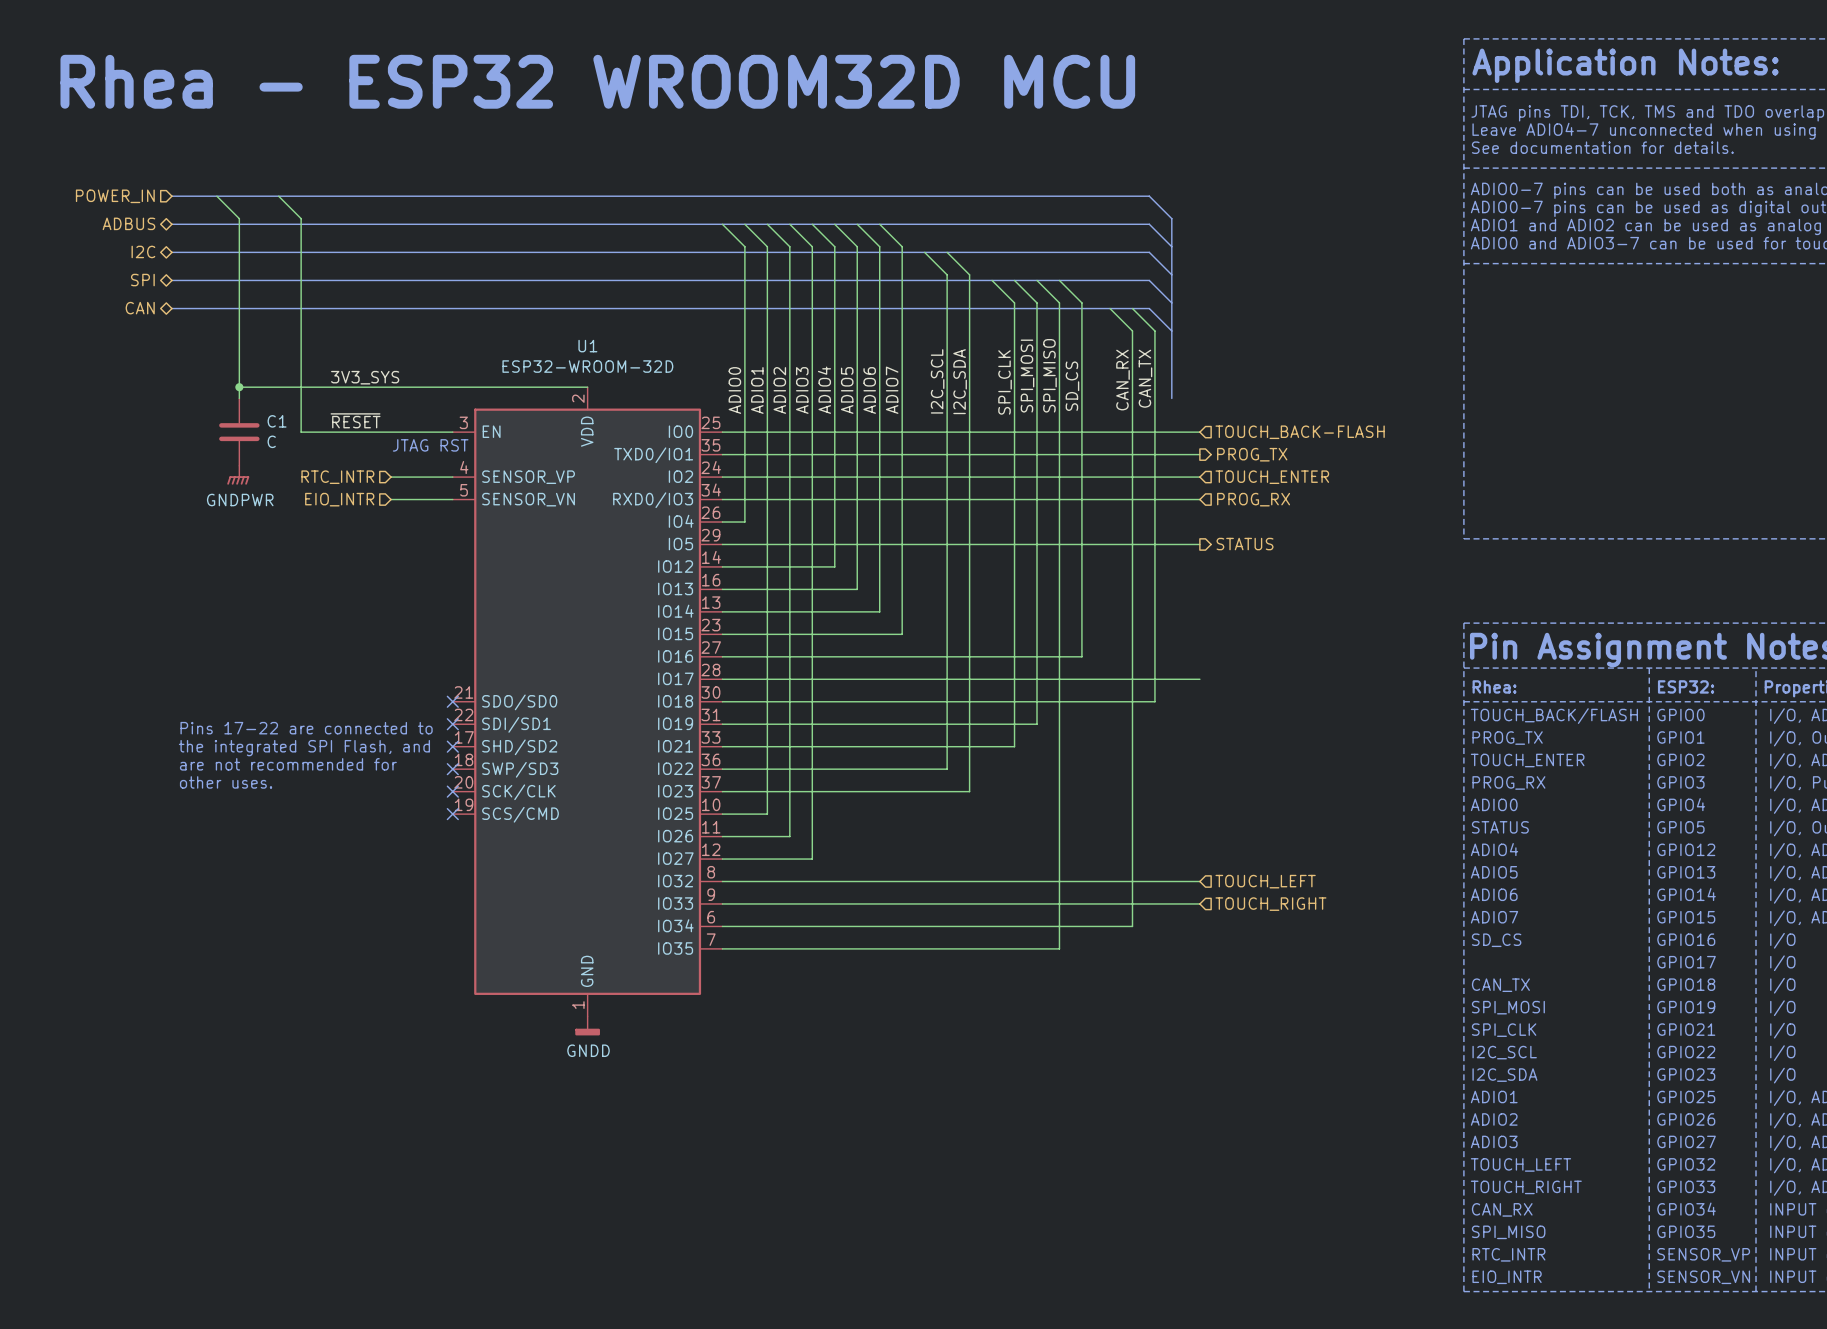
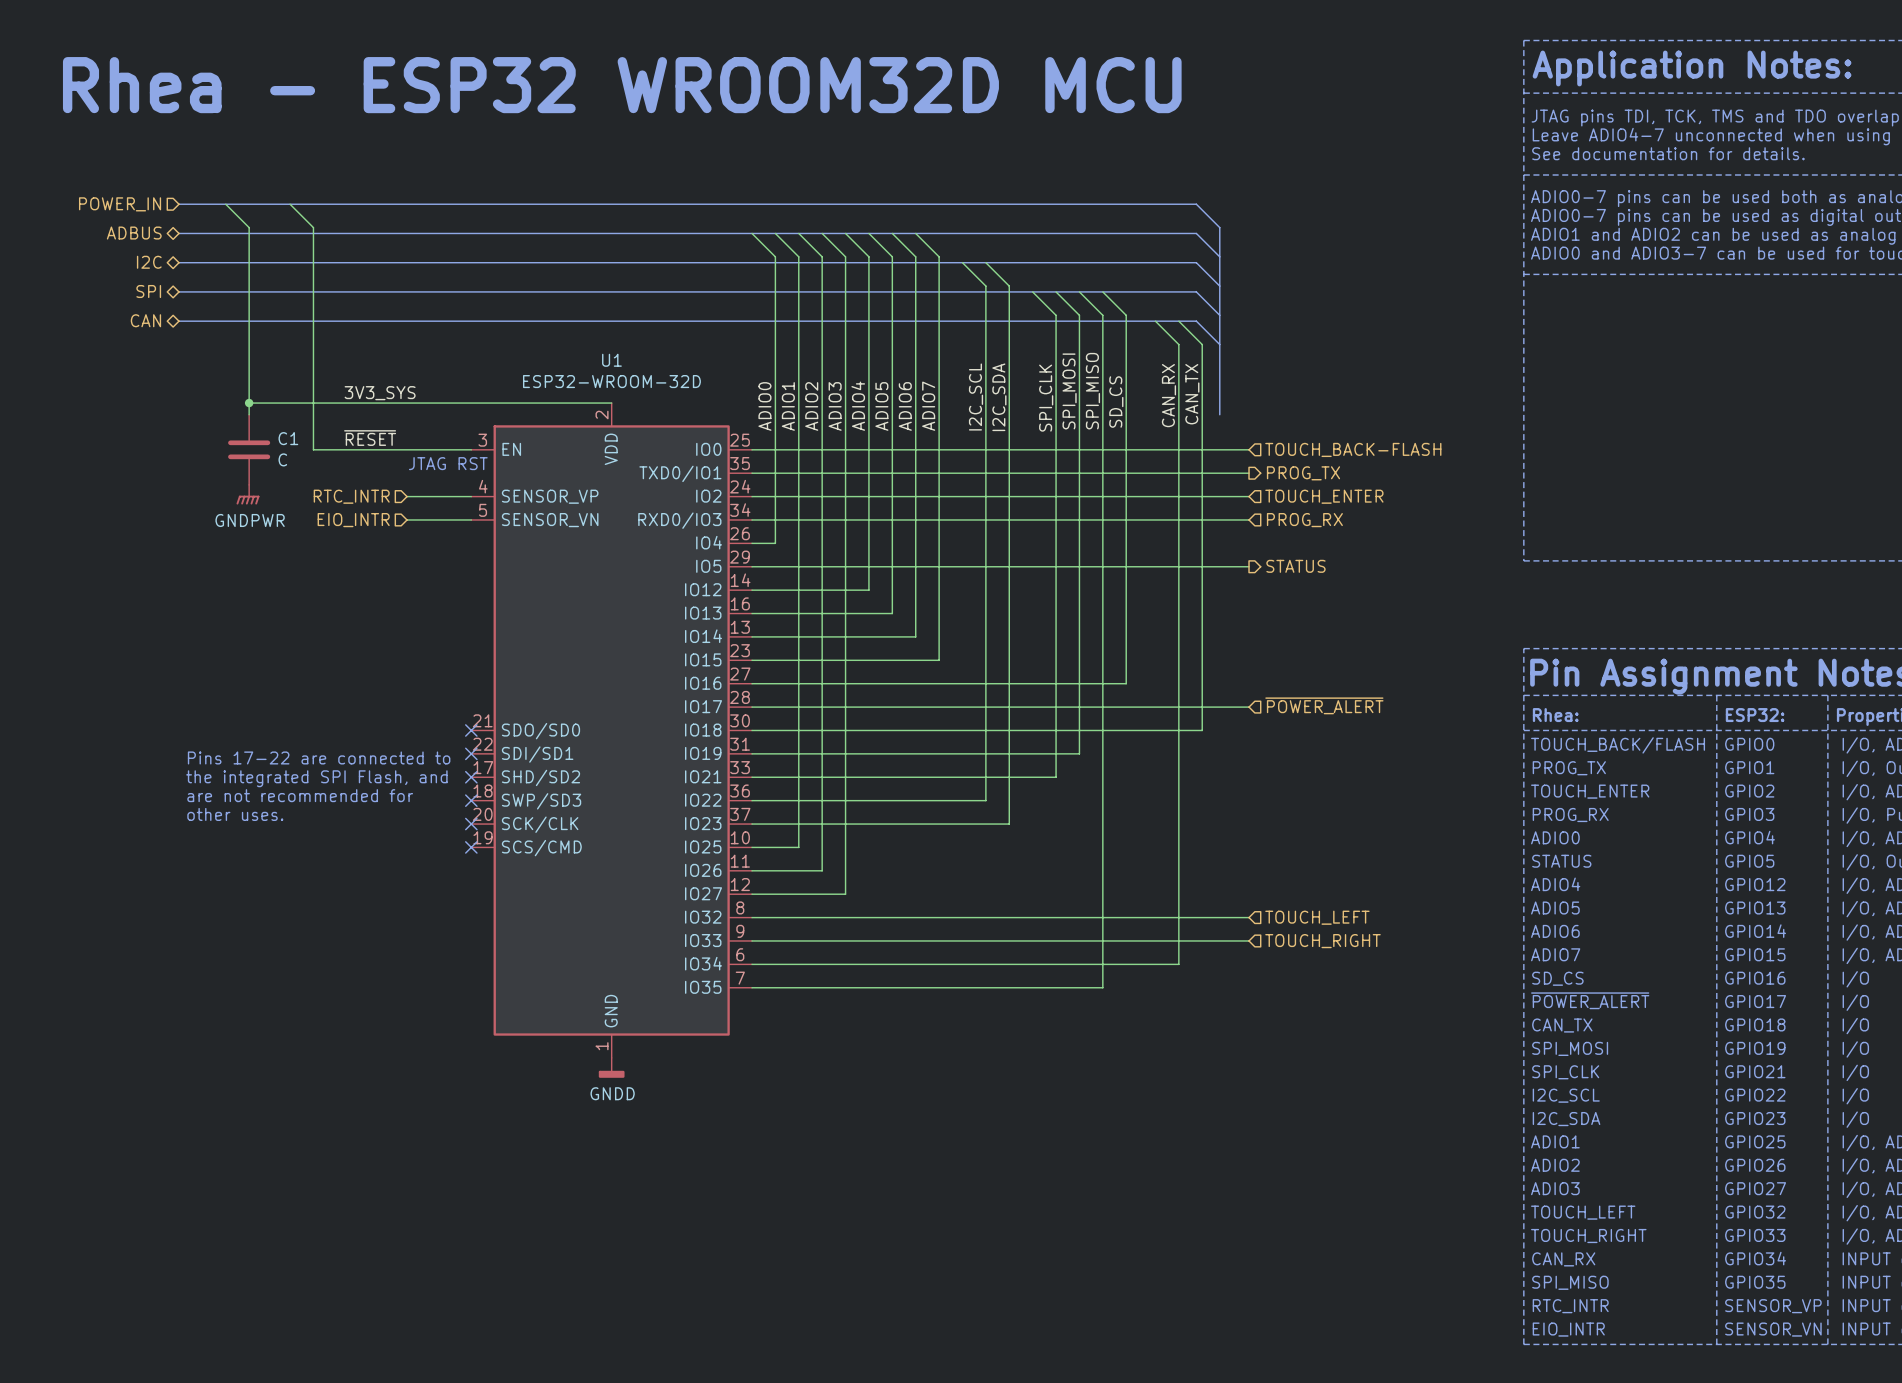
hierarchical label: none -> ~{POWER_ALERT} (1324, 705)
text: none -> ~{POWER_ALERT} (1590, 1000)

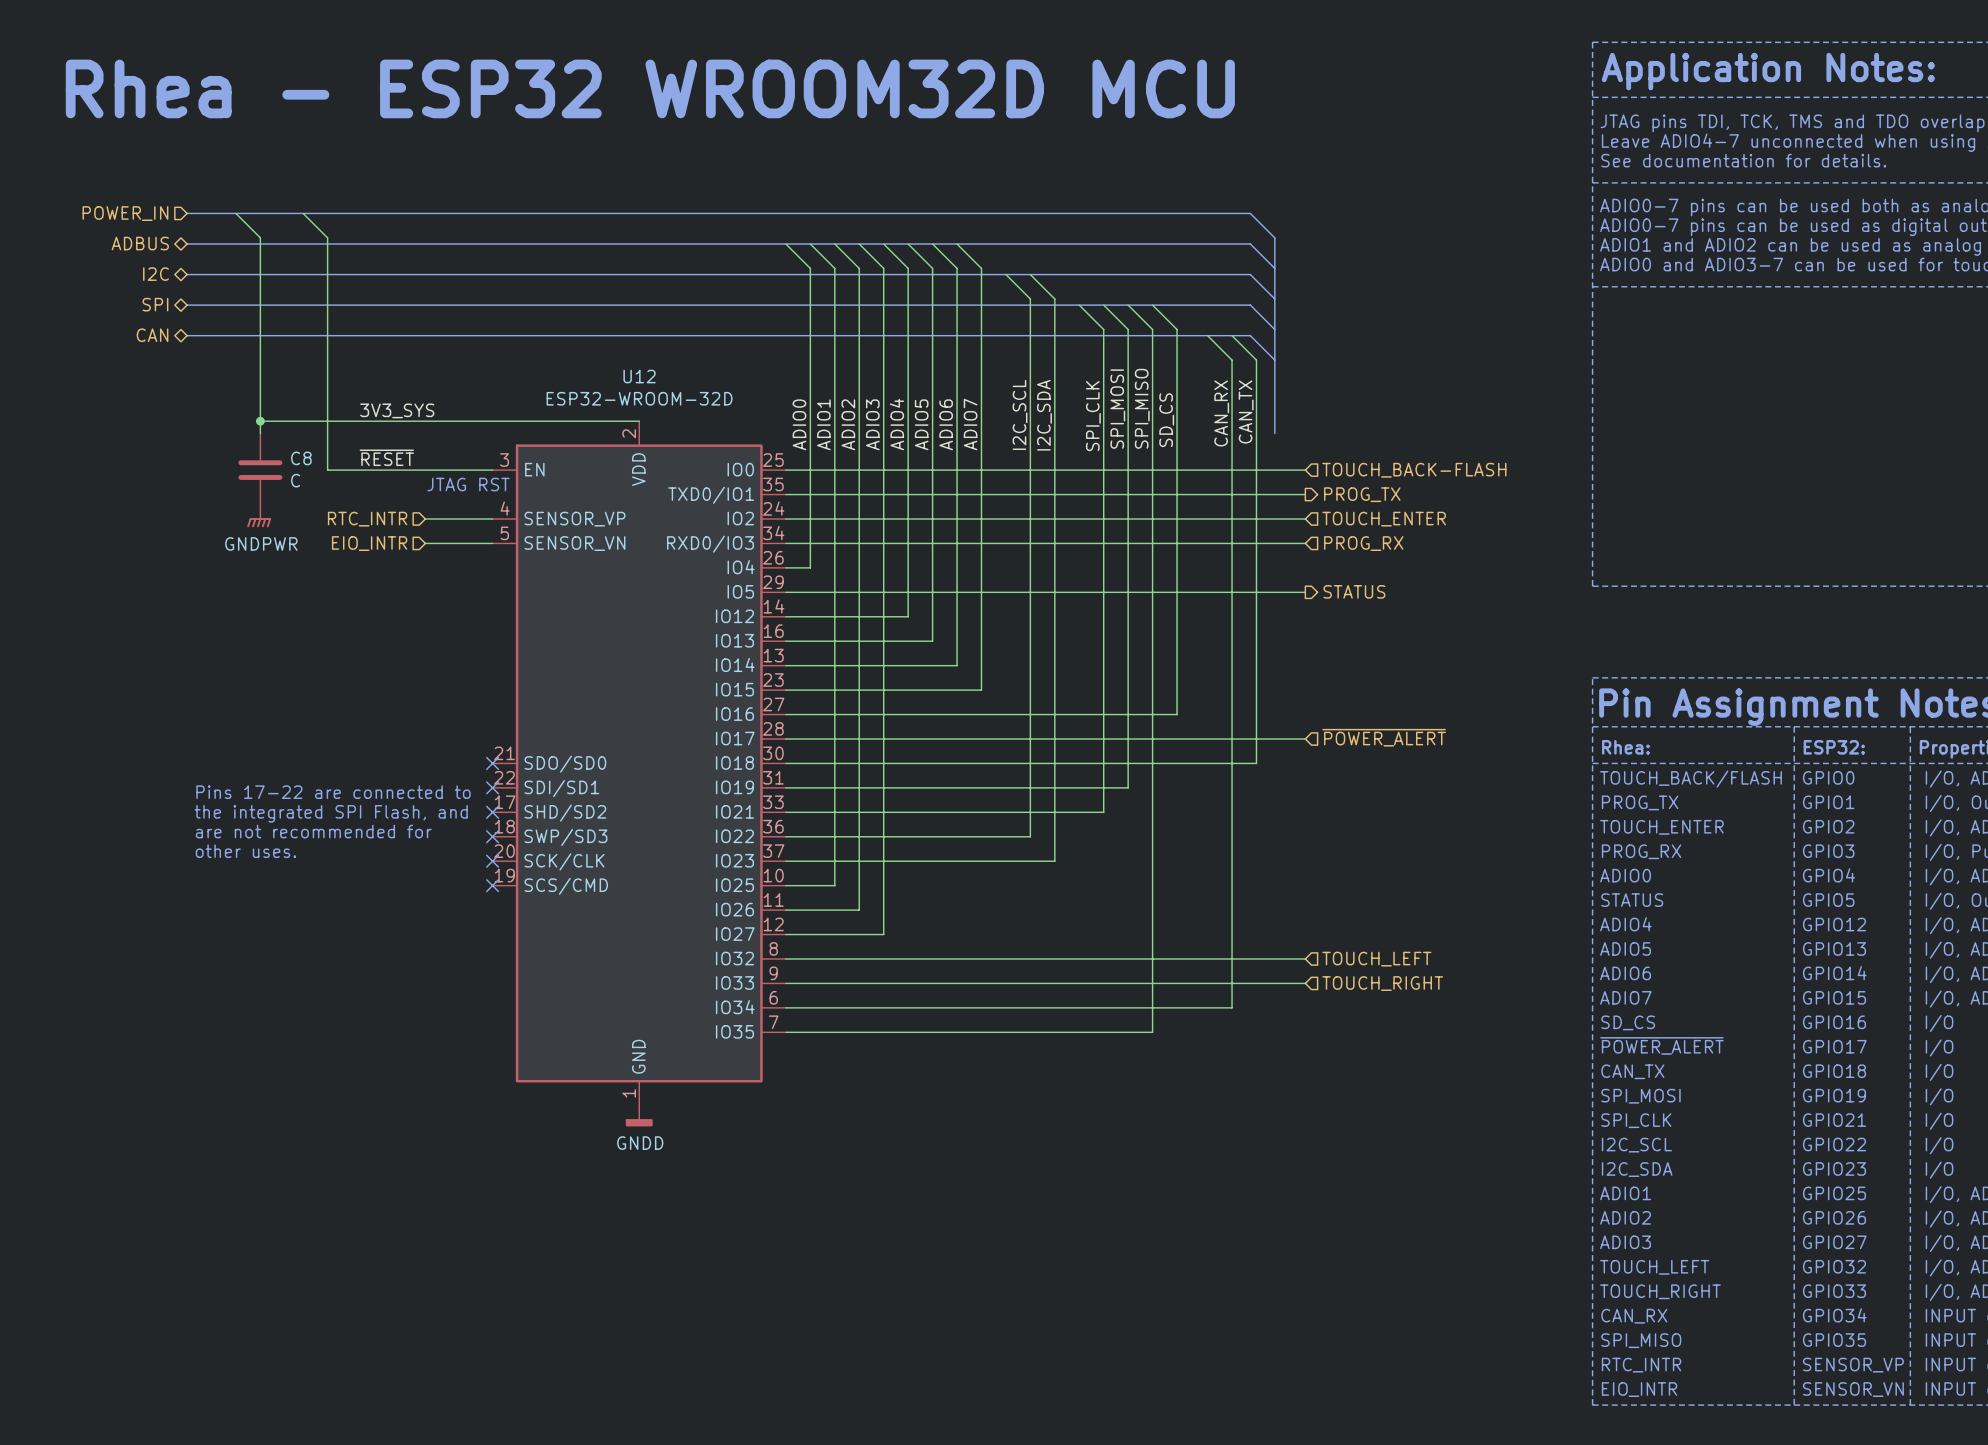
U1 name: U1 (611, 360) -> U12 (639, 376)
C1 name: C1 (288, 438) -> C8 (301, 458)

